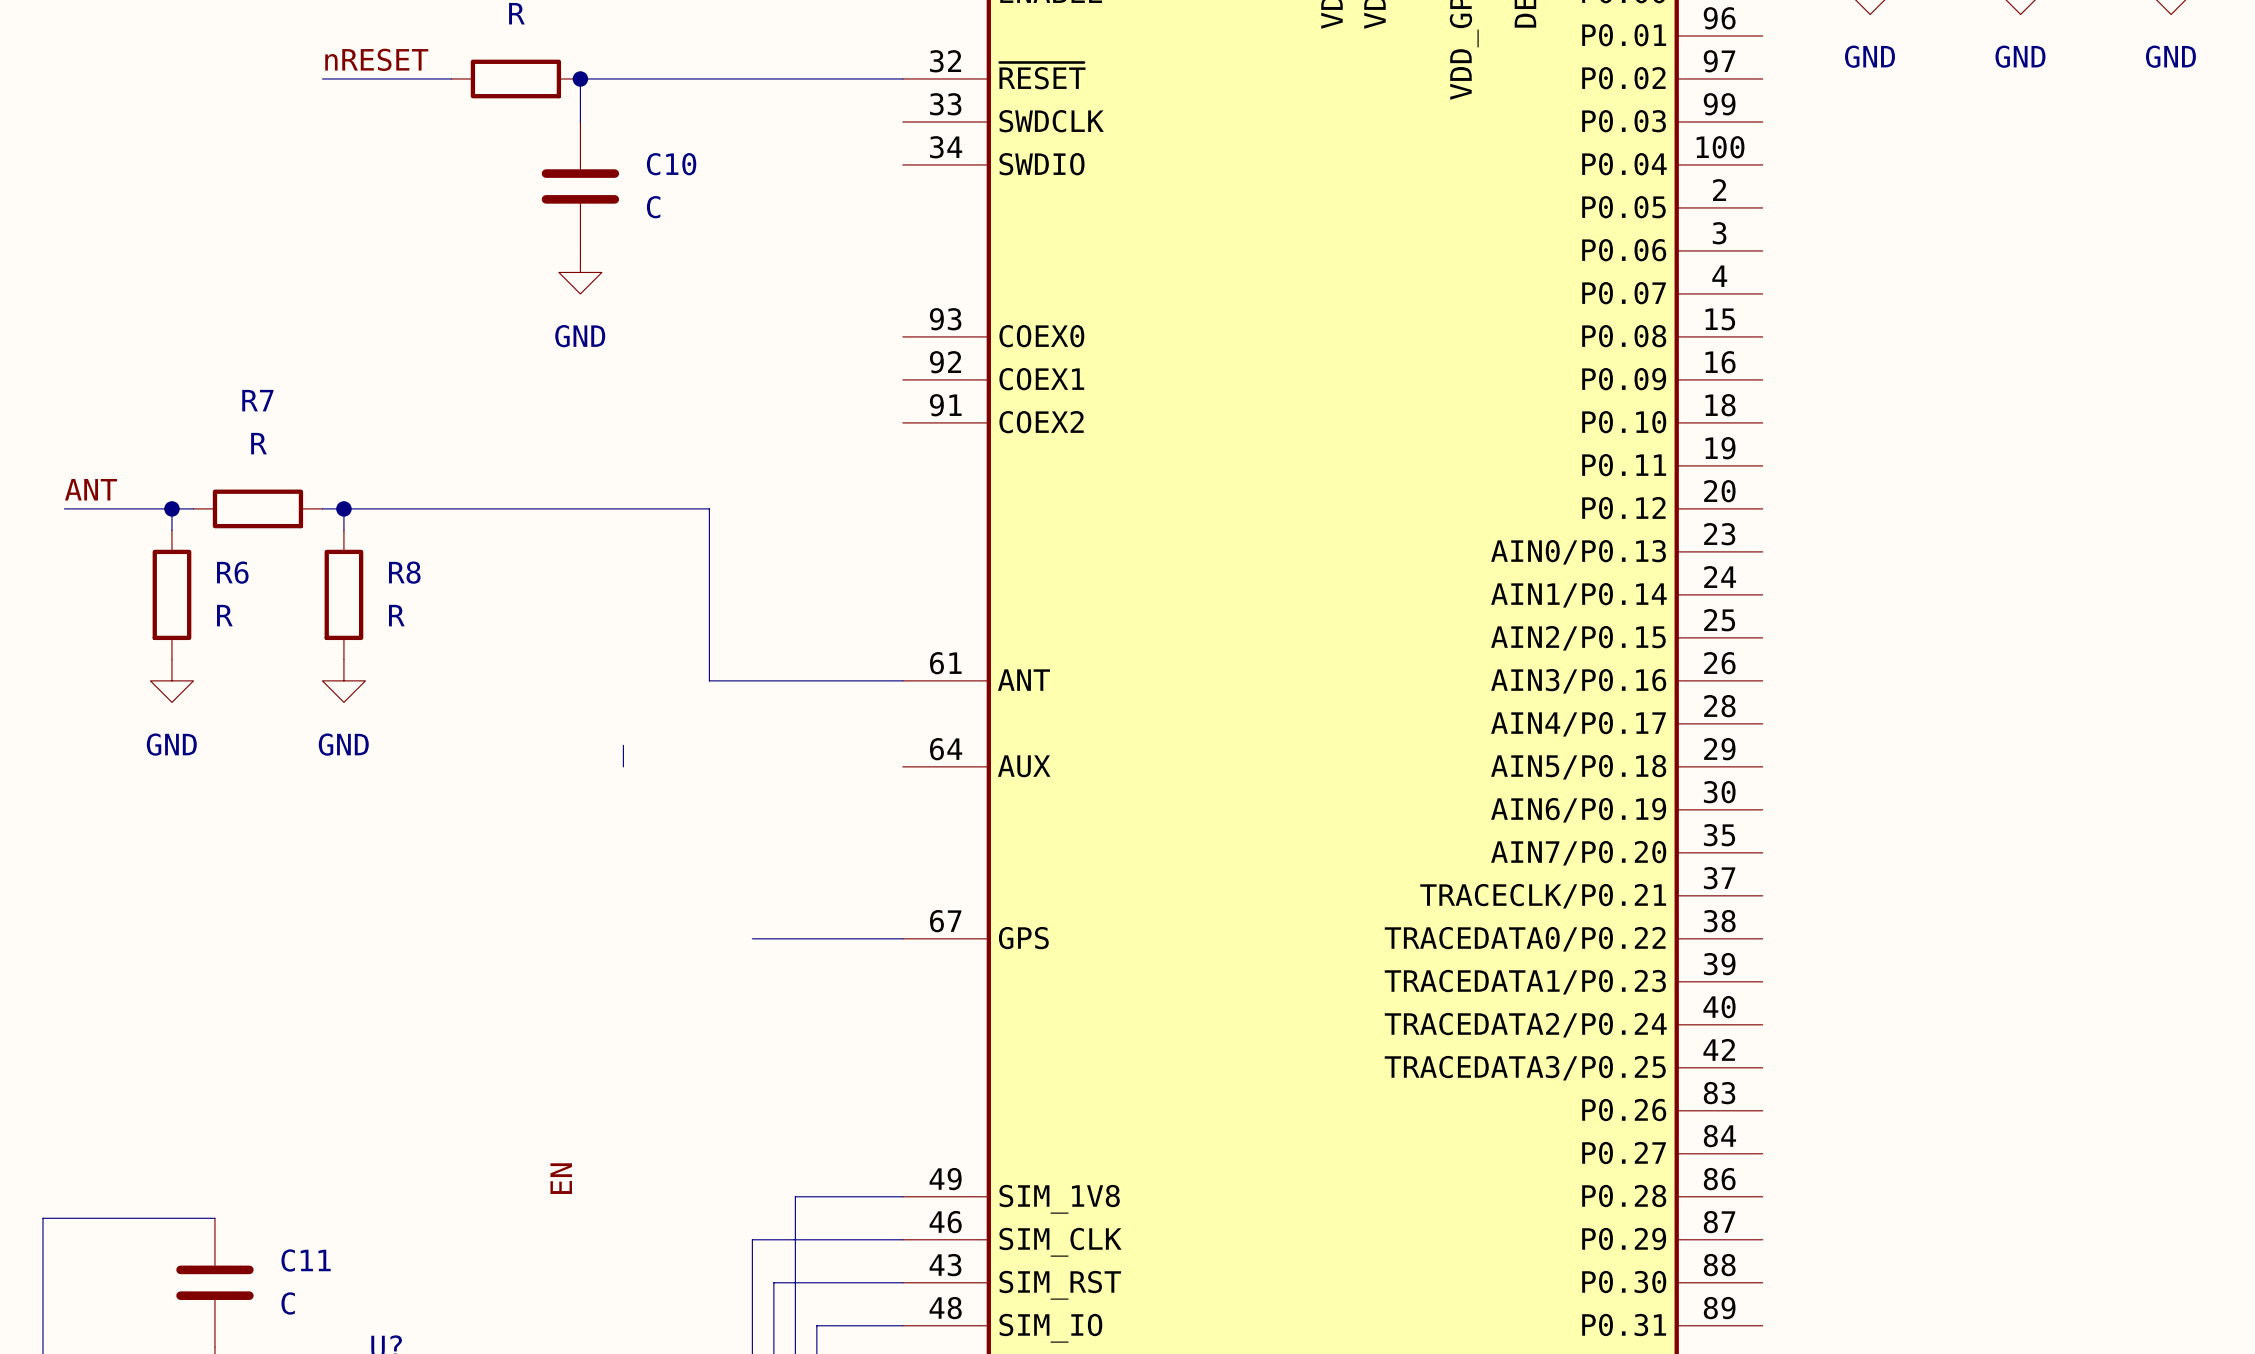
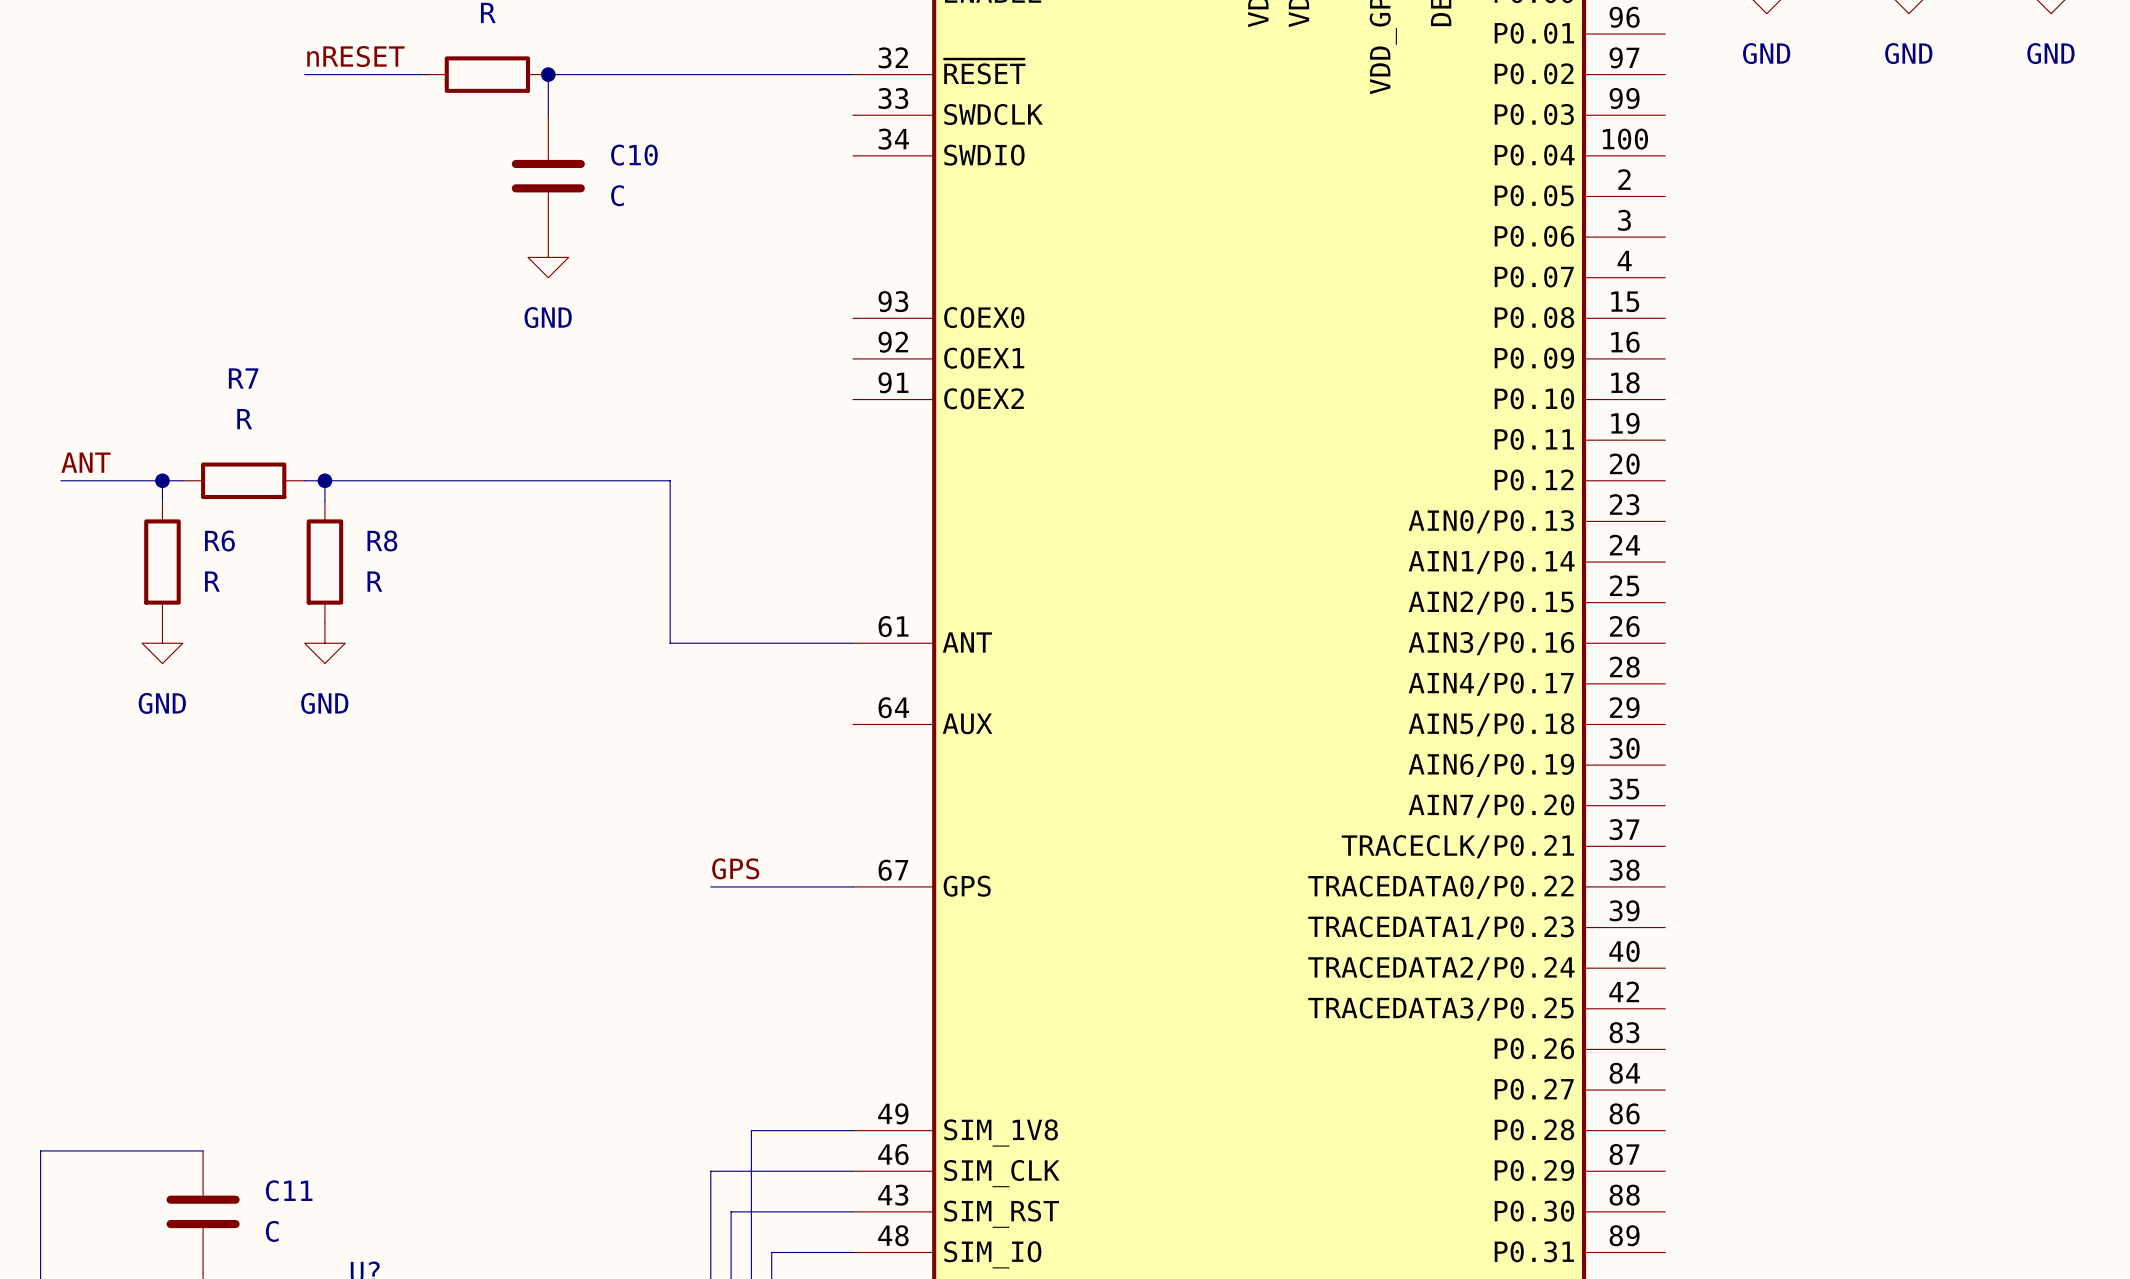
wire: (623, 745) (623, 766) -> none
label: none -> GPS (735, 868)
label: EN (561, 1178) -> none

